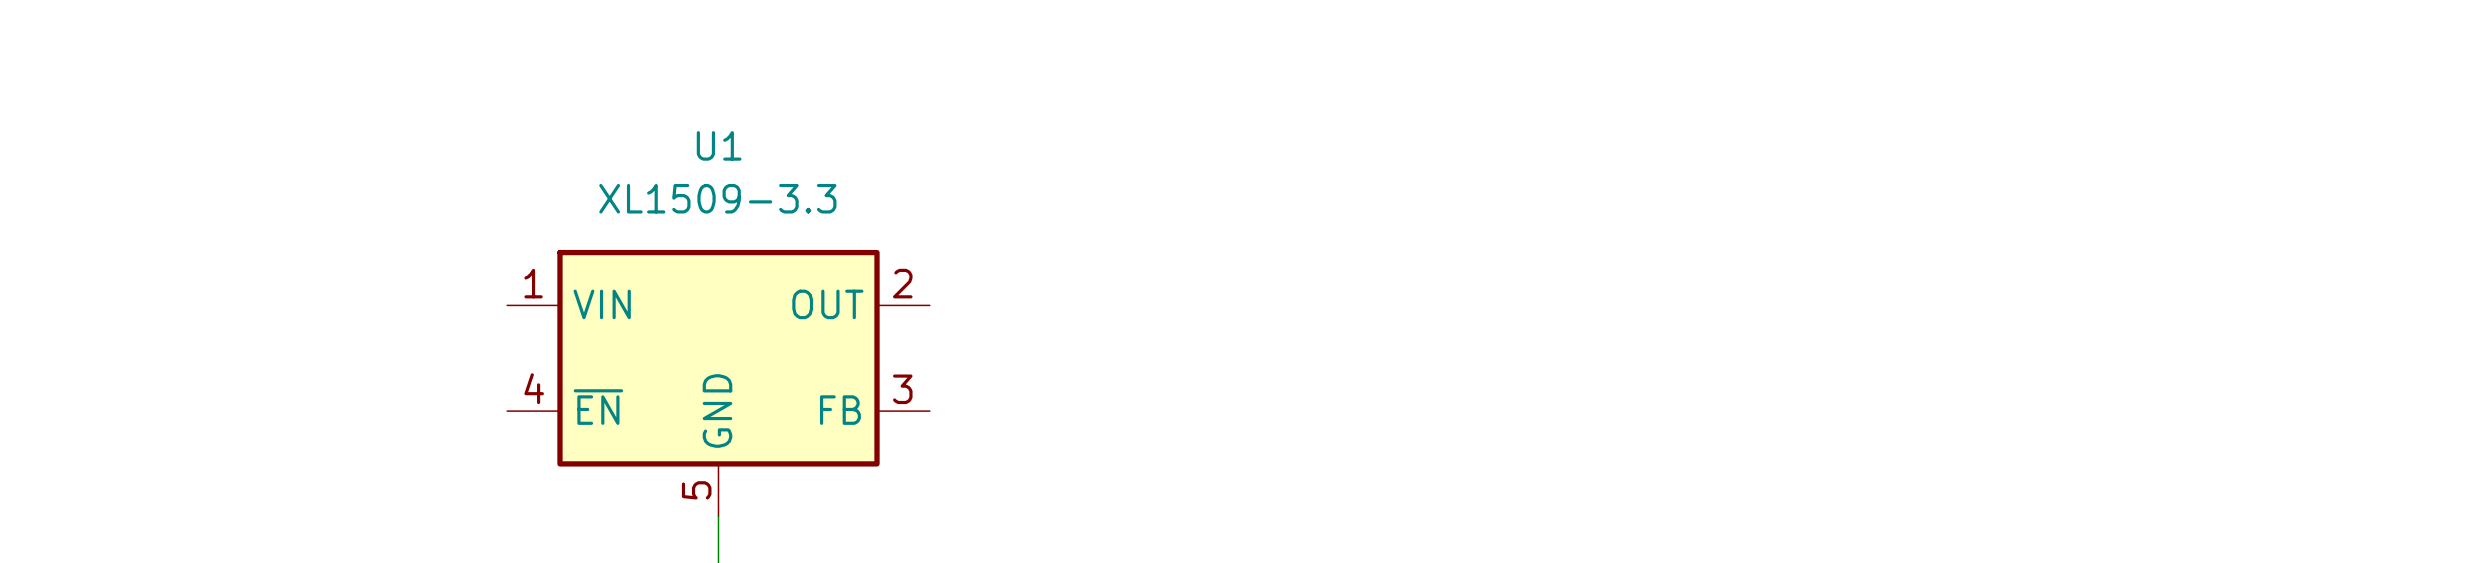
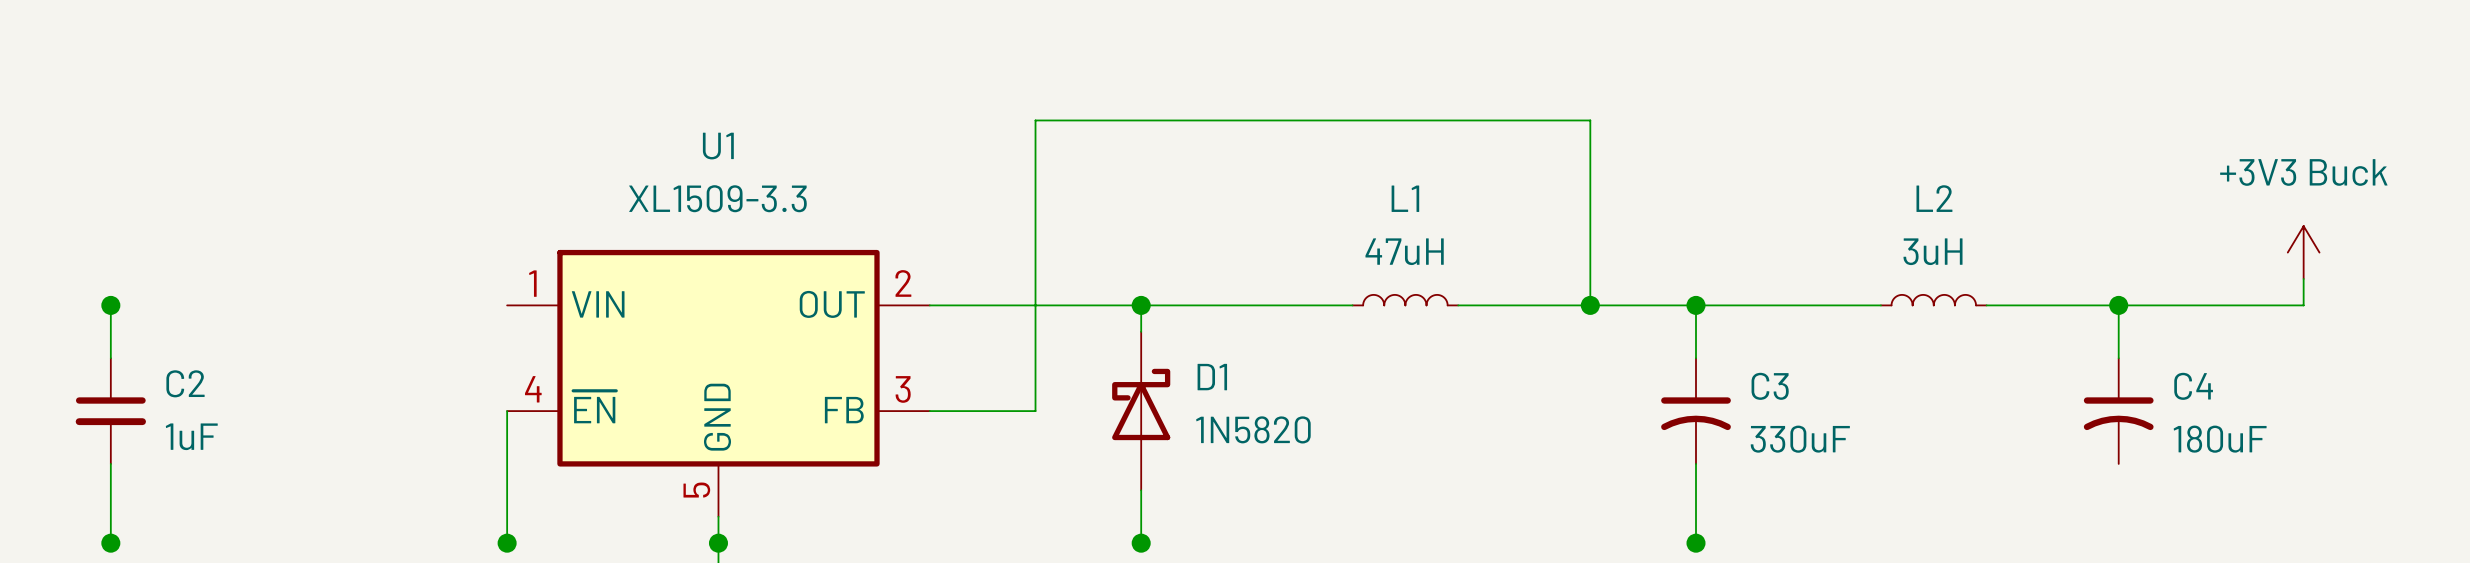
power symbol: none -> +3V3 Buck (2303, 252)
wire: none -> (2303, 278) (2303, 305) (1986, 305)
L1: none -> 47uH (1405, 300)
L2: none -> 3uH (1933, 300)
wire: none -> (110, 305) (110, 358)
junction: none -> (110, 305)
wire: none -> (929, 305) (1352, 305)
wire: none -> (1141, 305) (1141, 331)
junction: none -> (1141, 305)
wire: none -> (1458, 305) (1880, 305)
wire: none -> (1590, 305) (1590, 120) (1035, 120) (1035, 411) (929, 411)
junction: none -> (1590, 305)
wire: none -> (1696, 305) (1696, 358)
junction: none -> (1696, 305)
wire: none -> (2118, 305) (2118, 358)
junction: none -> (2118, 305)
C2: none -> 1uF (110, 411)
wire: none -> (507, 411) (507, 543)
D1: none -> 1N5820 (1141, 411)
C3: none -> 330uF (1696, 411)
C4: none -> 180uF (2118, 411)
wire: none -> (110, 463) (110, 543)
wire: none -> (1696, 463) (1696, 543)
wire: none -> (1141, 490) (1141, 543)
junction: none -> (110, 543)
junction: none -> (507, 543)
junction: none -> (718, 543)
junction: none -> (1141, 543)
junction: none -> (1696, 543)

